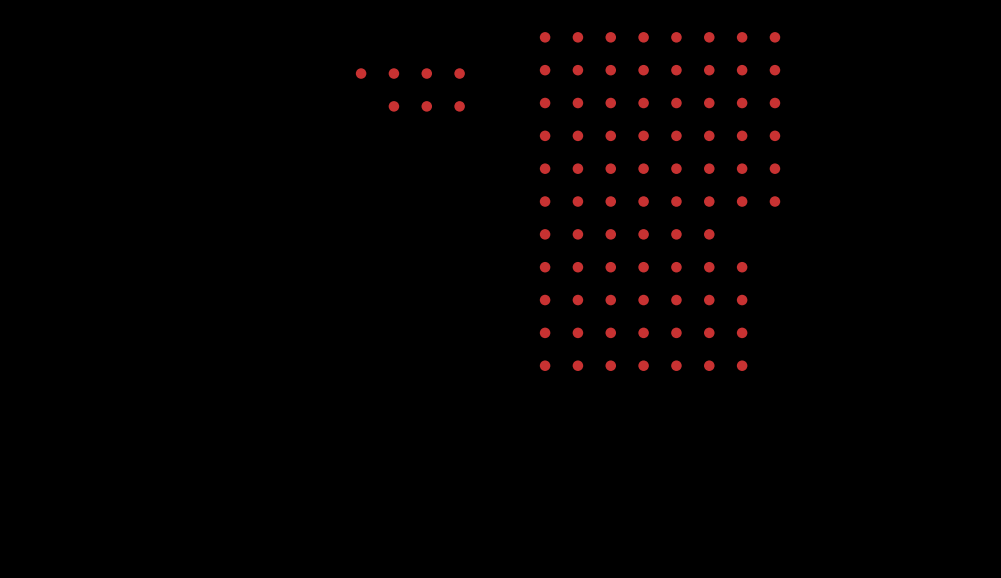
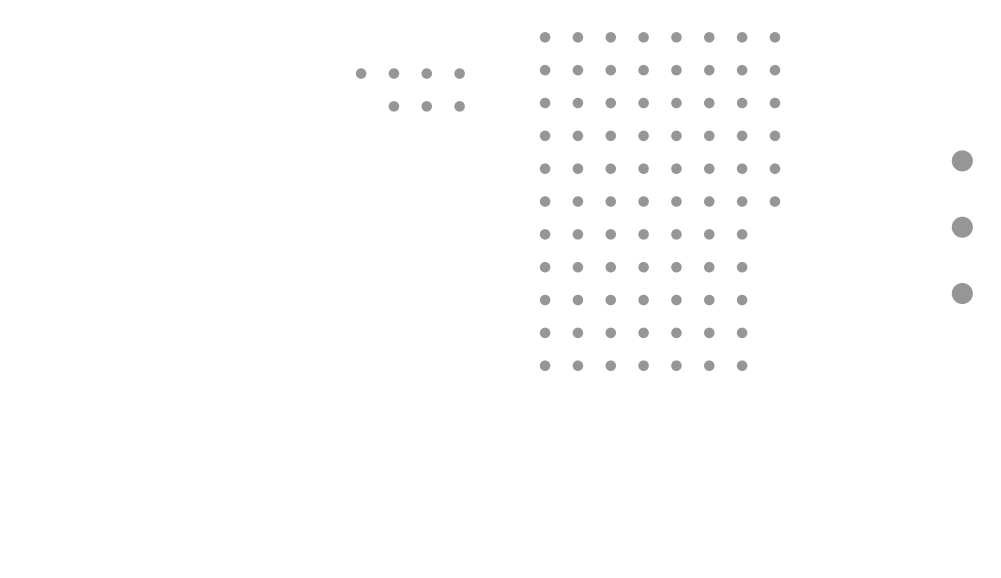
part: none -> (962, 160)
part: none -> (962, 227)
part: none -> (742, 234)
part: none -> (962, 293)

